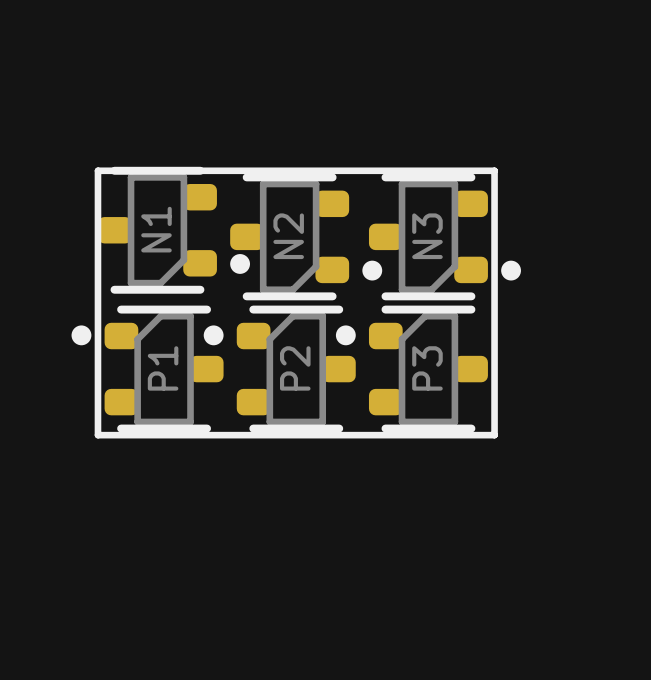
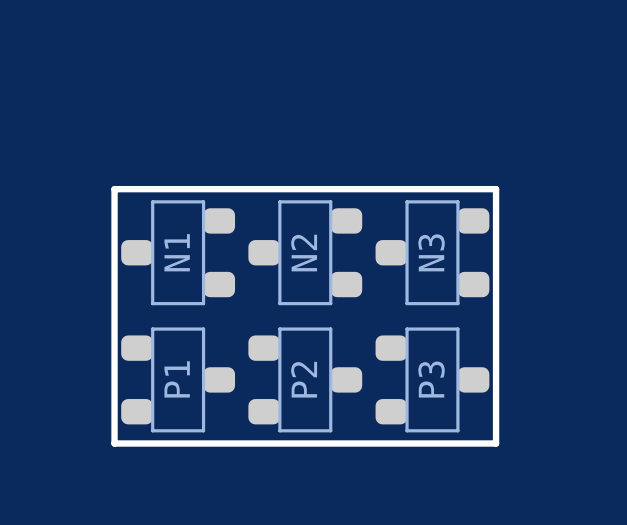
N1 footprint: [97, 166, 251, 294] -> [121, 200, 236, 306]
N2 footprint: [230, 173, 383, 301] -> [248, 200, 363, 306]
N3 footprint: [368, 173, 521, 301] -> [375, 200, 490, 306]
P1 footprint: [71, 305, 224, 433] -> [121, 327, 236, 433]
P2 footprint: [203, 305, 356, 433] -> [248, 327, 363, 433]
P3 footprint: [335, 305, 488, 433] -> [375, 327, 490, 433]

